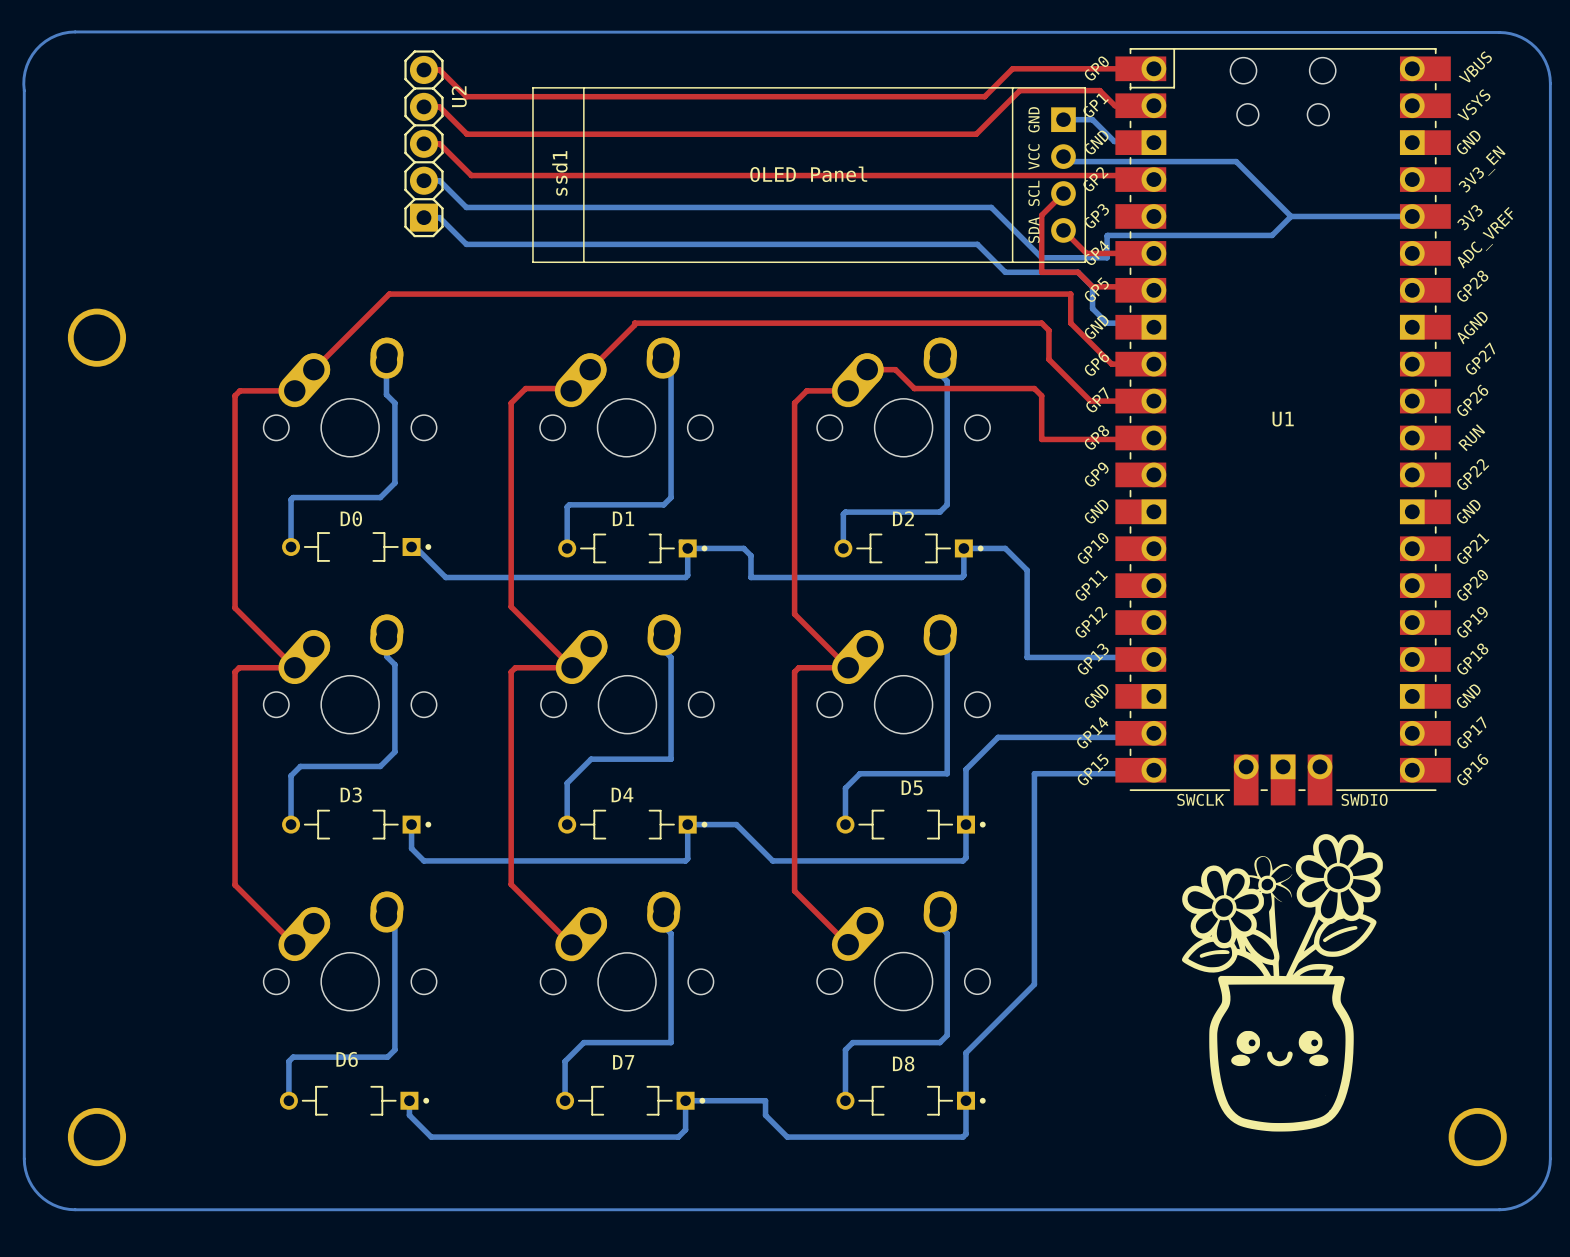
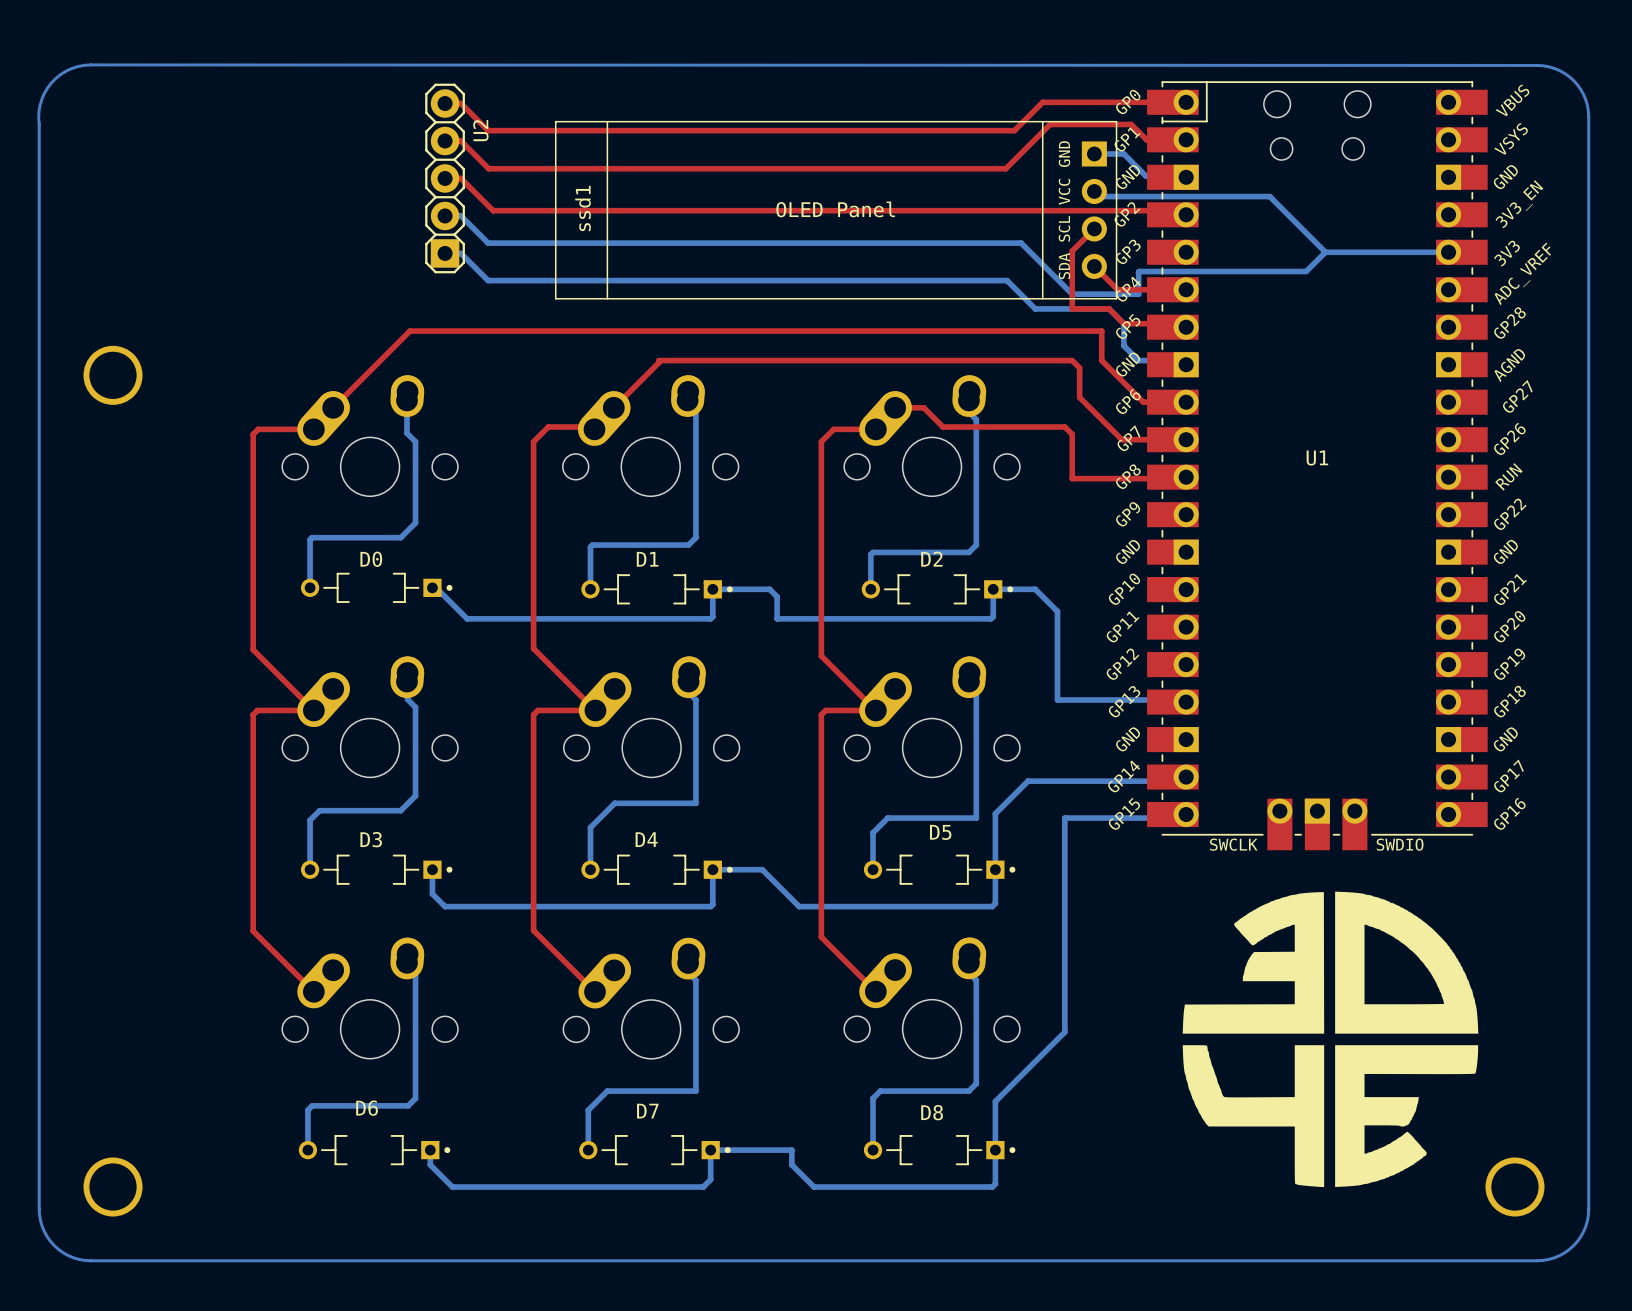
drawing: [1181, 834, 1383, 1132] -> none
drawing: none -> [1182, 891, 1479, 1188]

